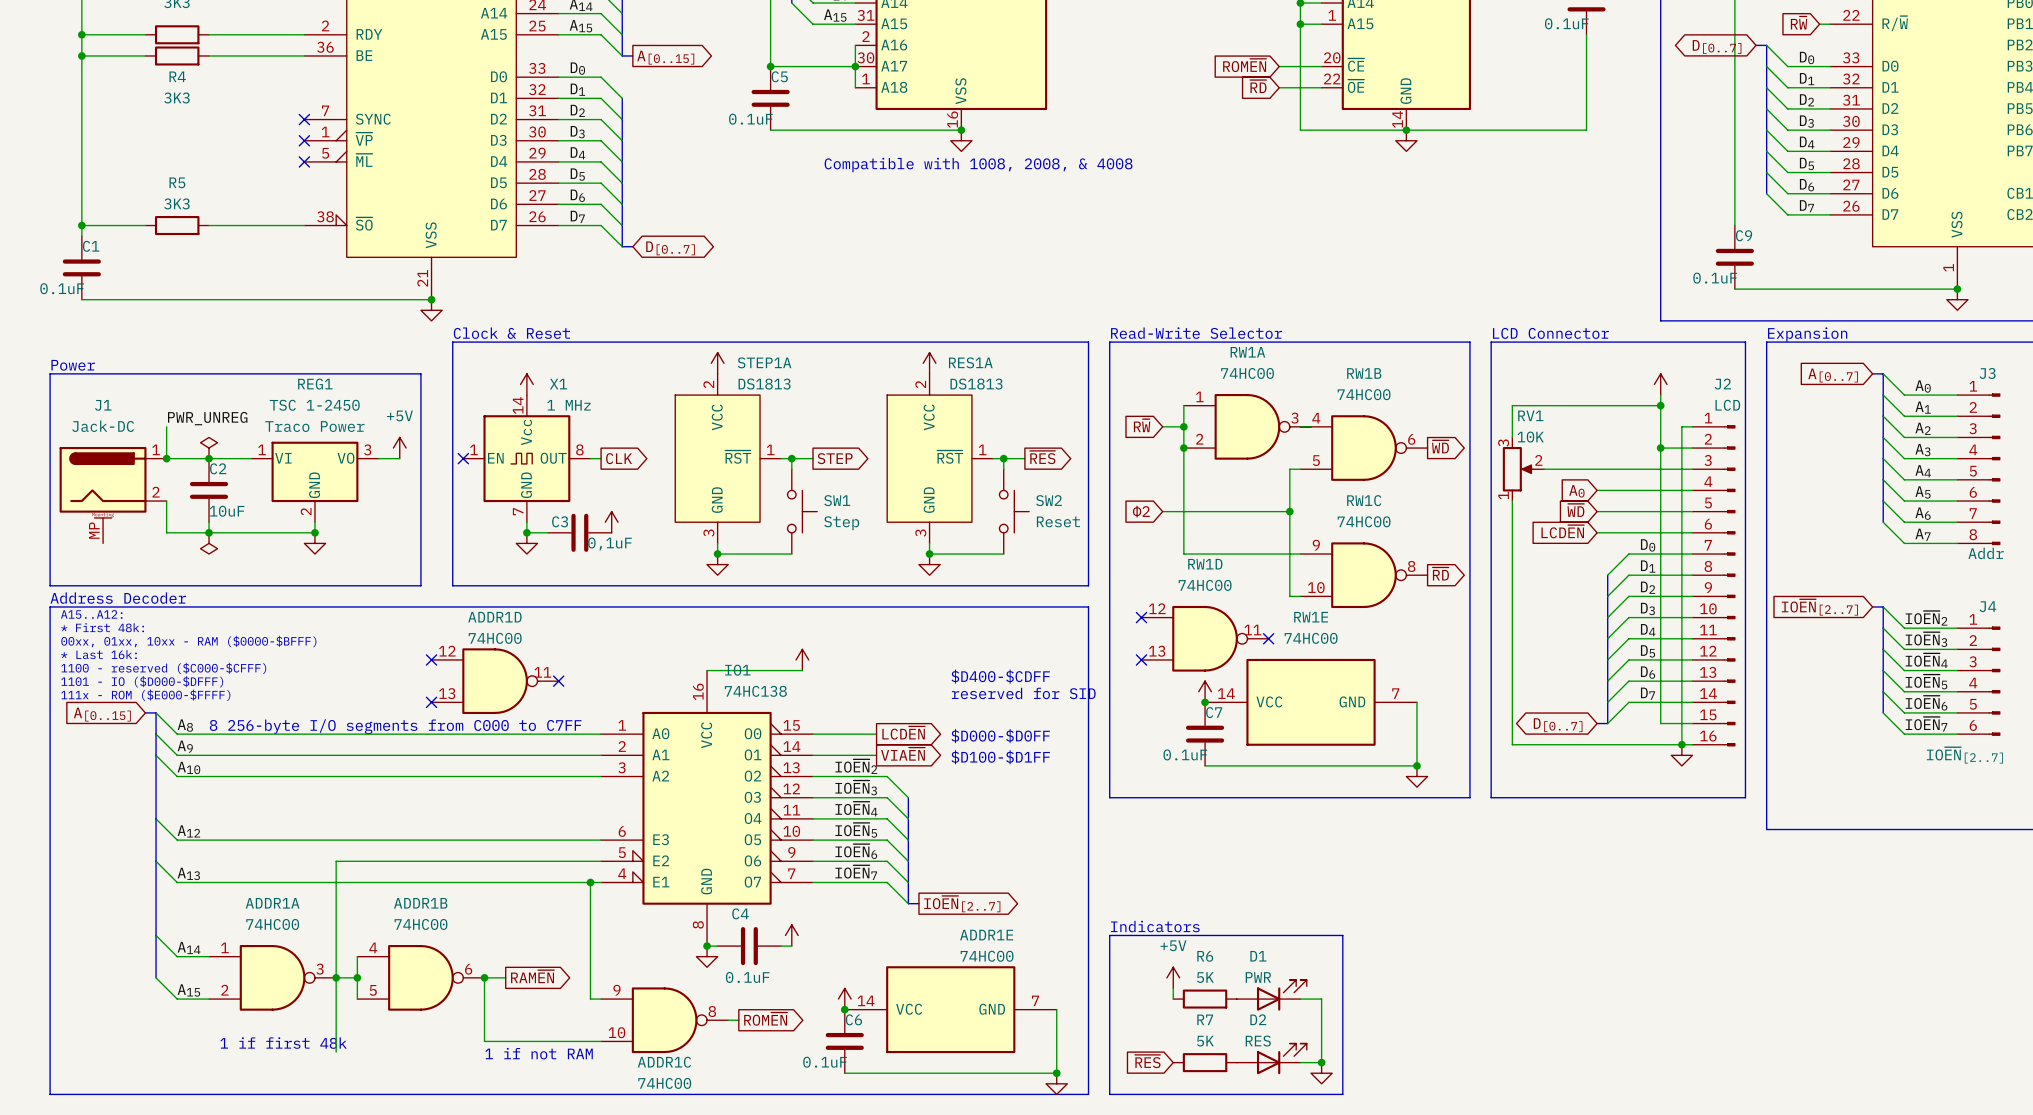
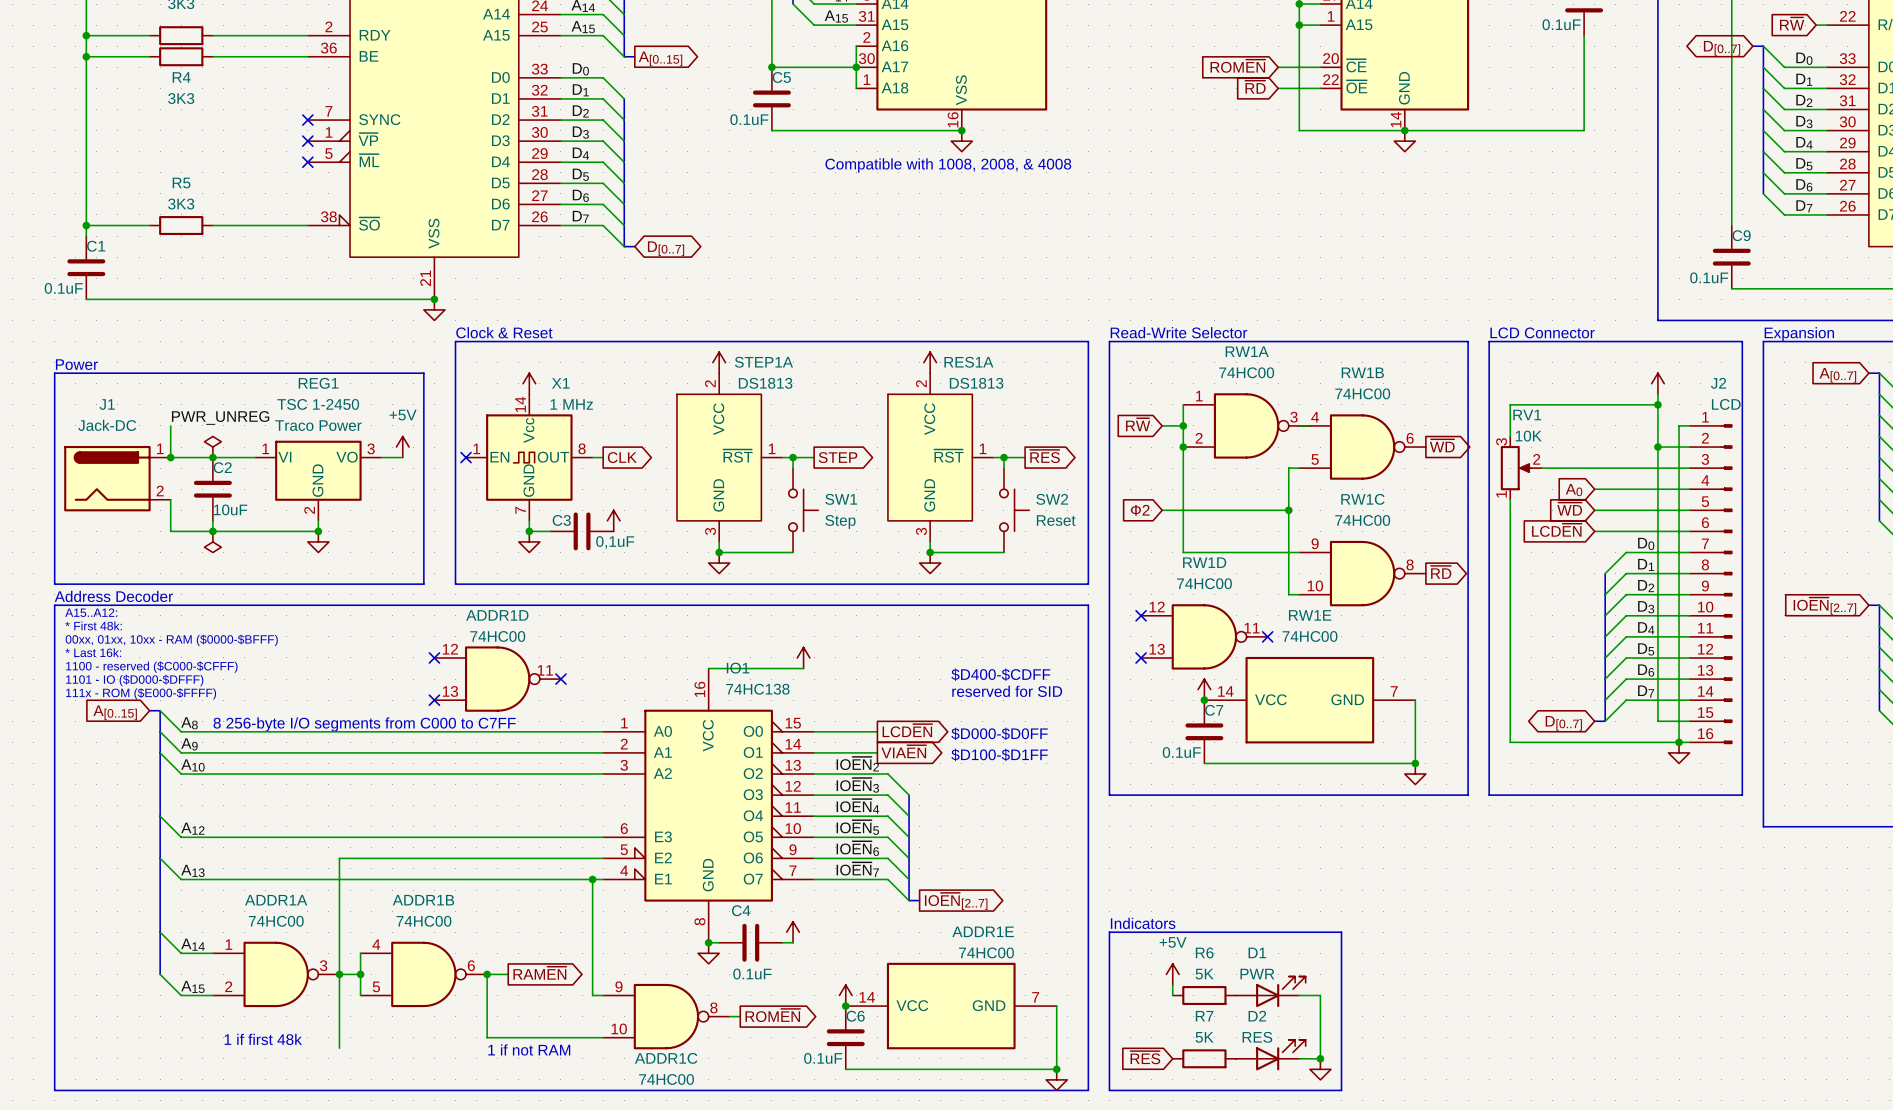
J1 symbol: [59, 446, 167, 544] -> [64, 445, 171, 512]

